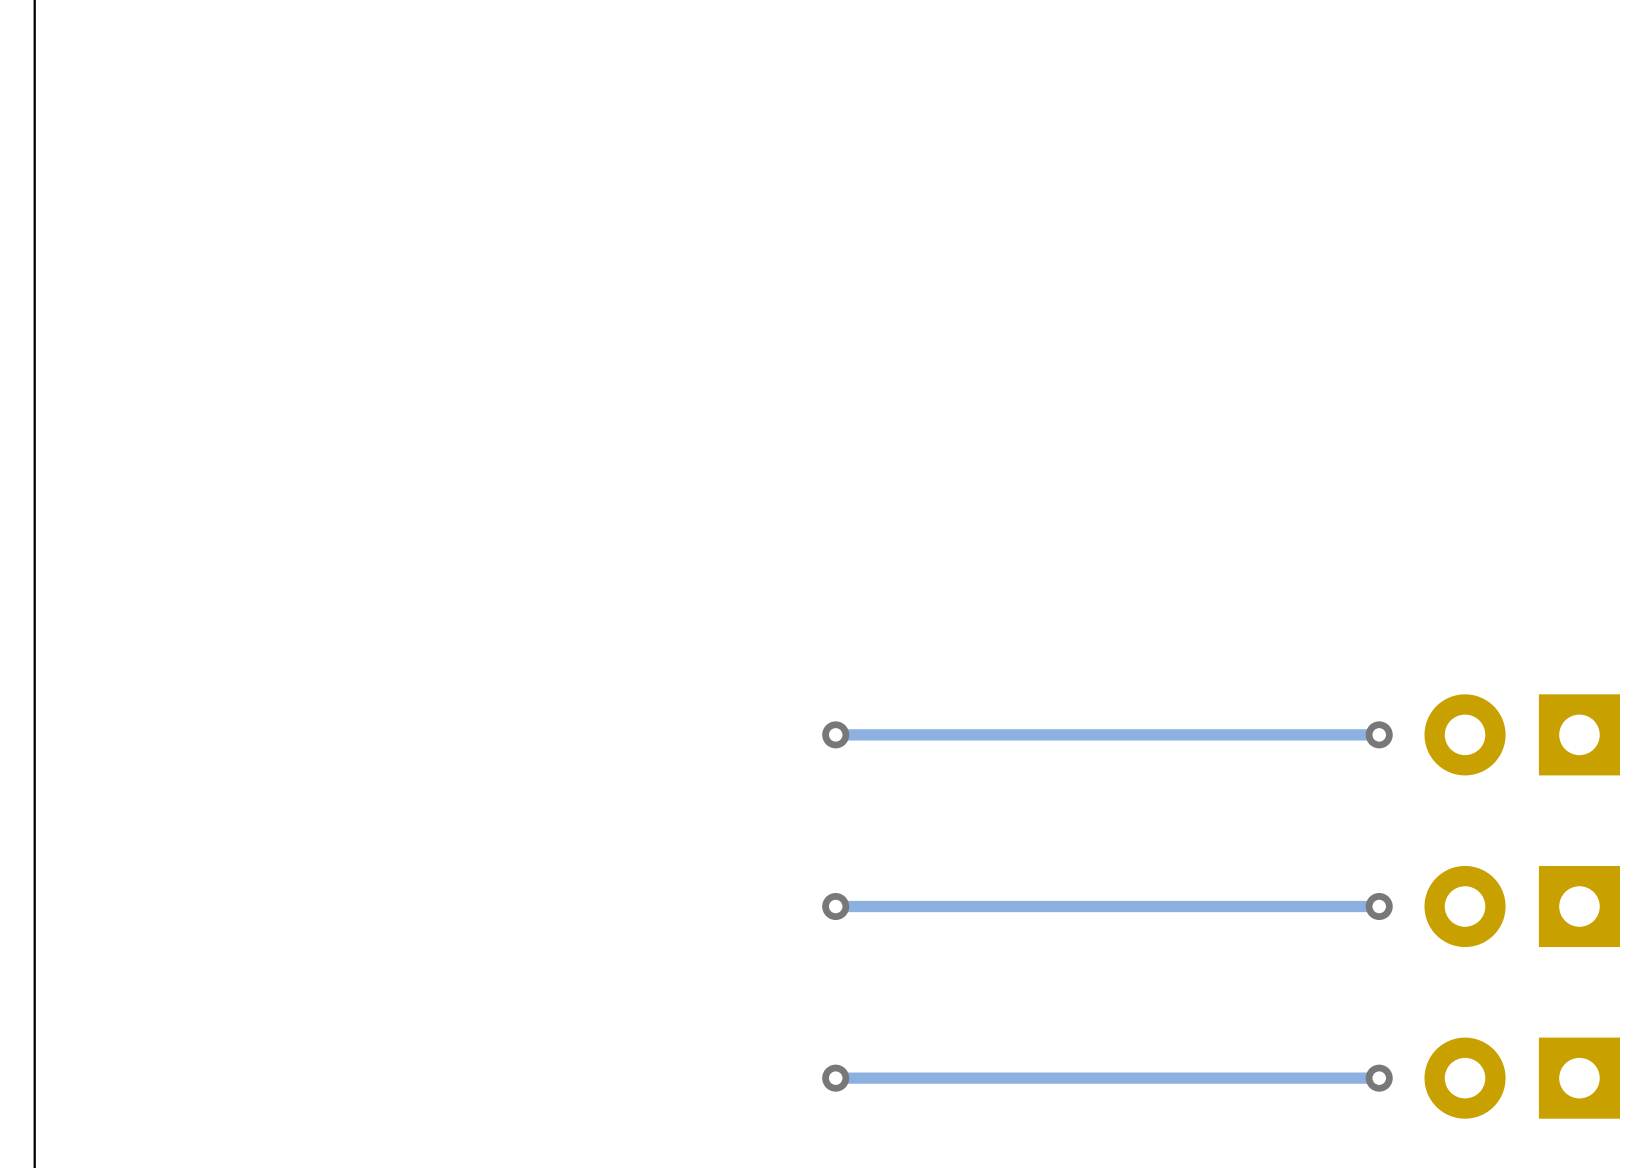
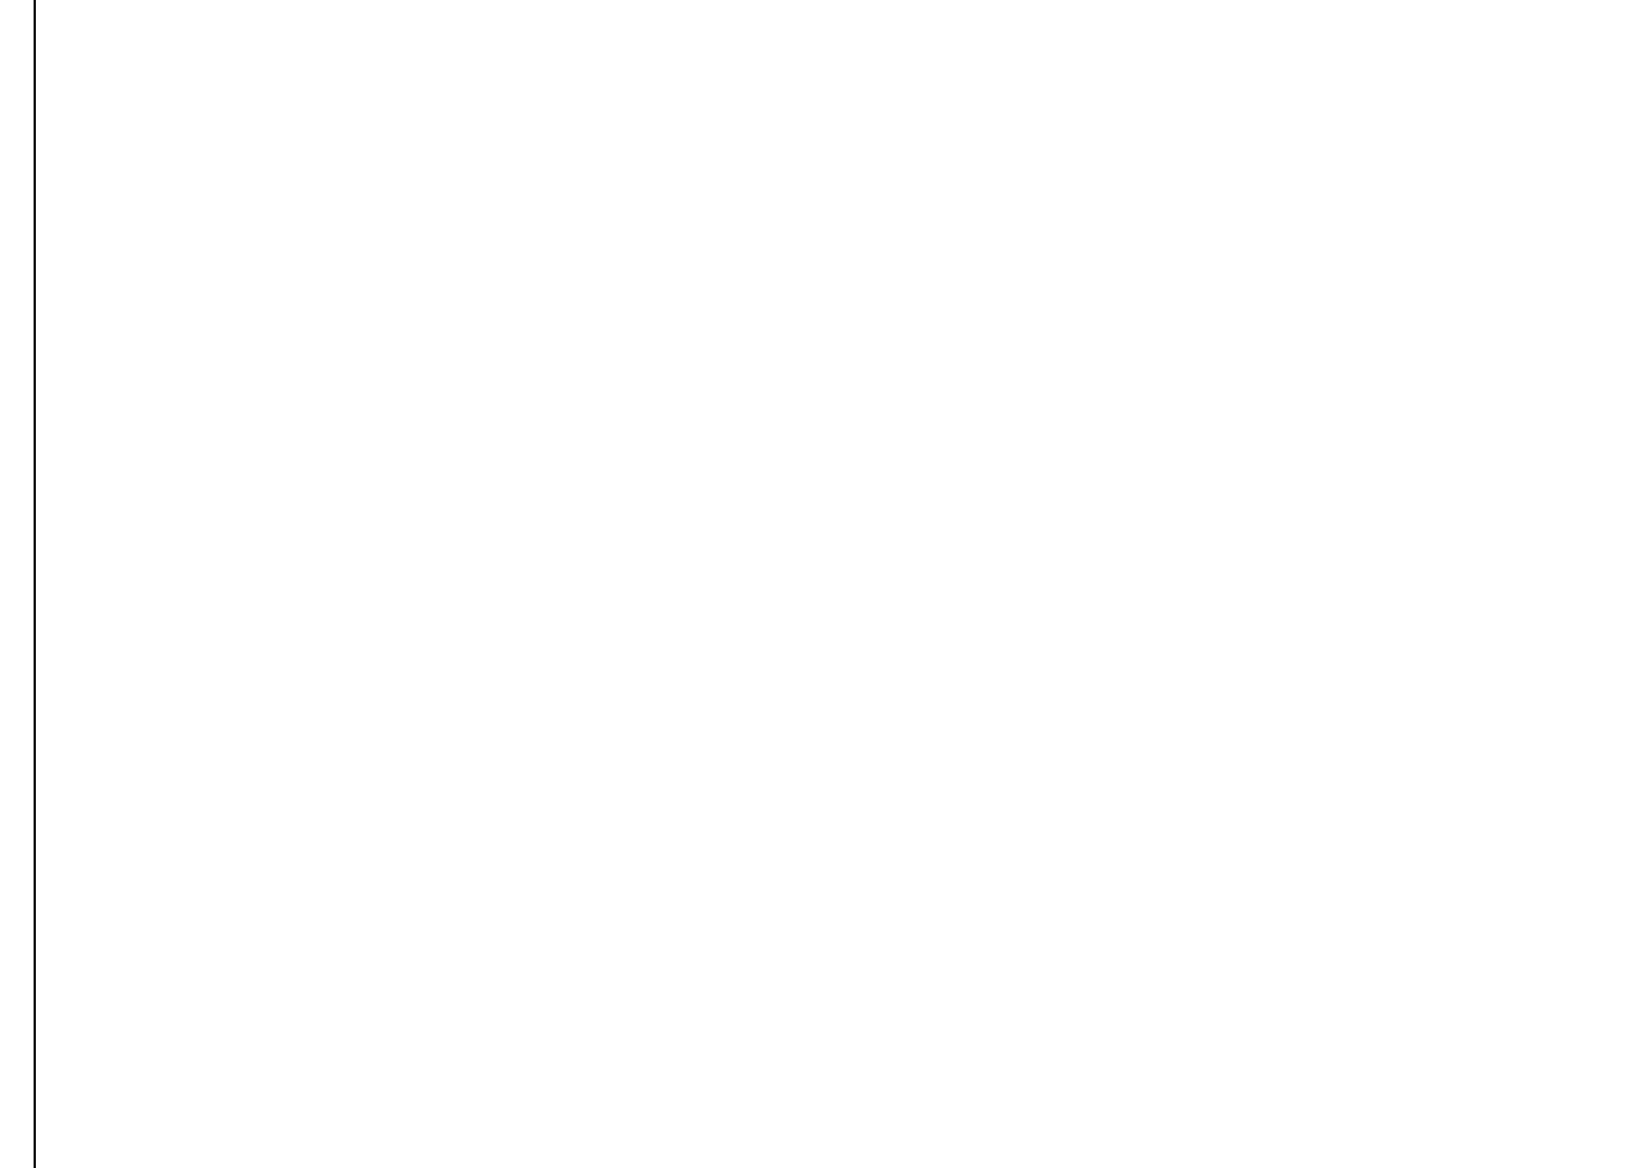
via: (835, 734) -> none
track: (1379, 734) (835, 734) -> none
via: (1379, 734) -> none
part: (1522, 734) -> none
via: (835, 906) -> none
track: (1379, 906) (835, 906) -> none
via: (1379, 906) -> none
part: (1522, 906) -> none
via: (835, 1078) -> none
track: (1379, 1078) (835, 1078) -> none
via: (1379, 1078) -> none
part: (1522, 1078) -> none

